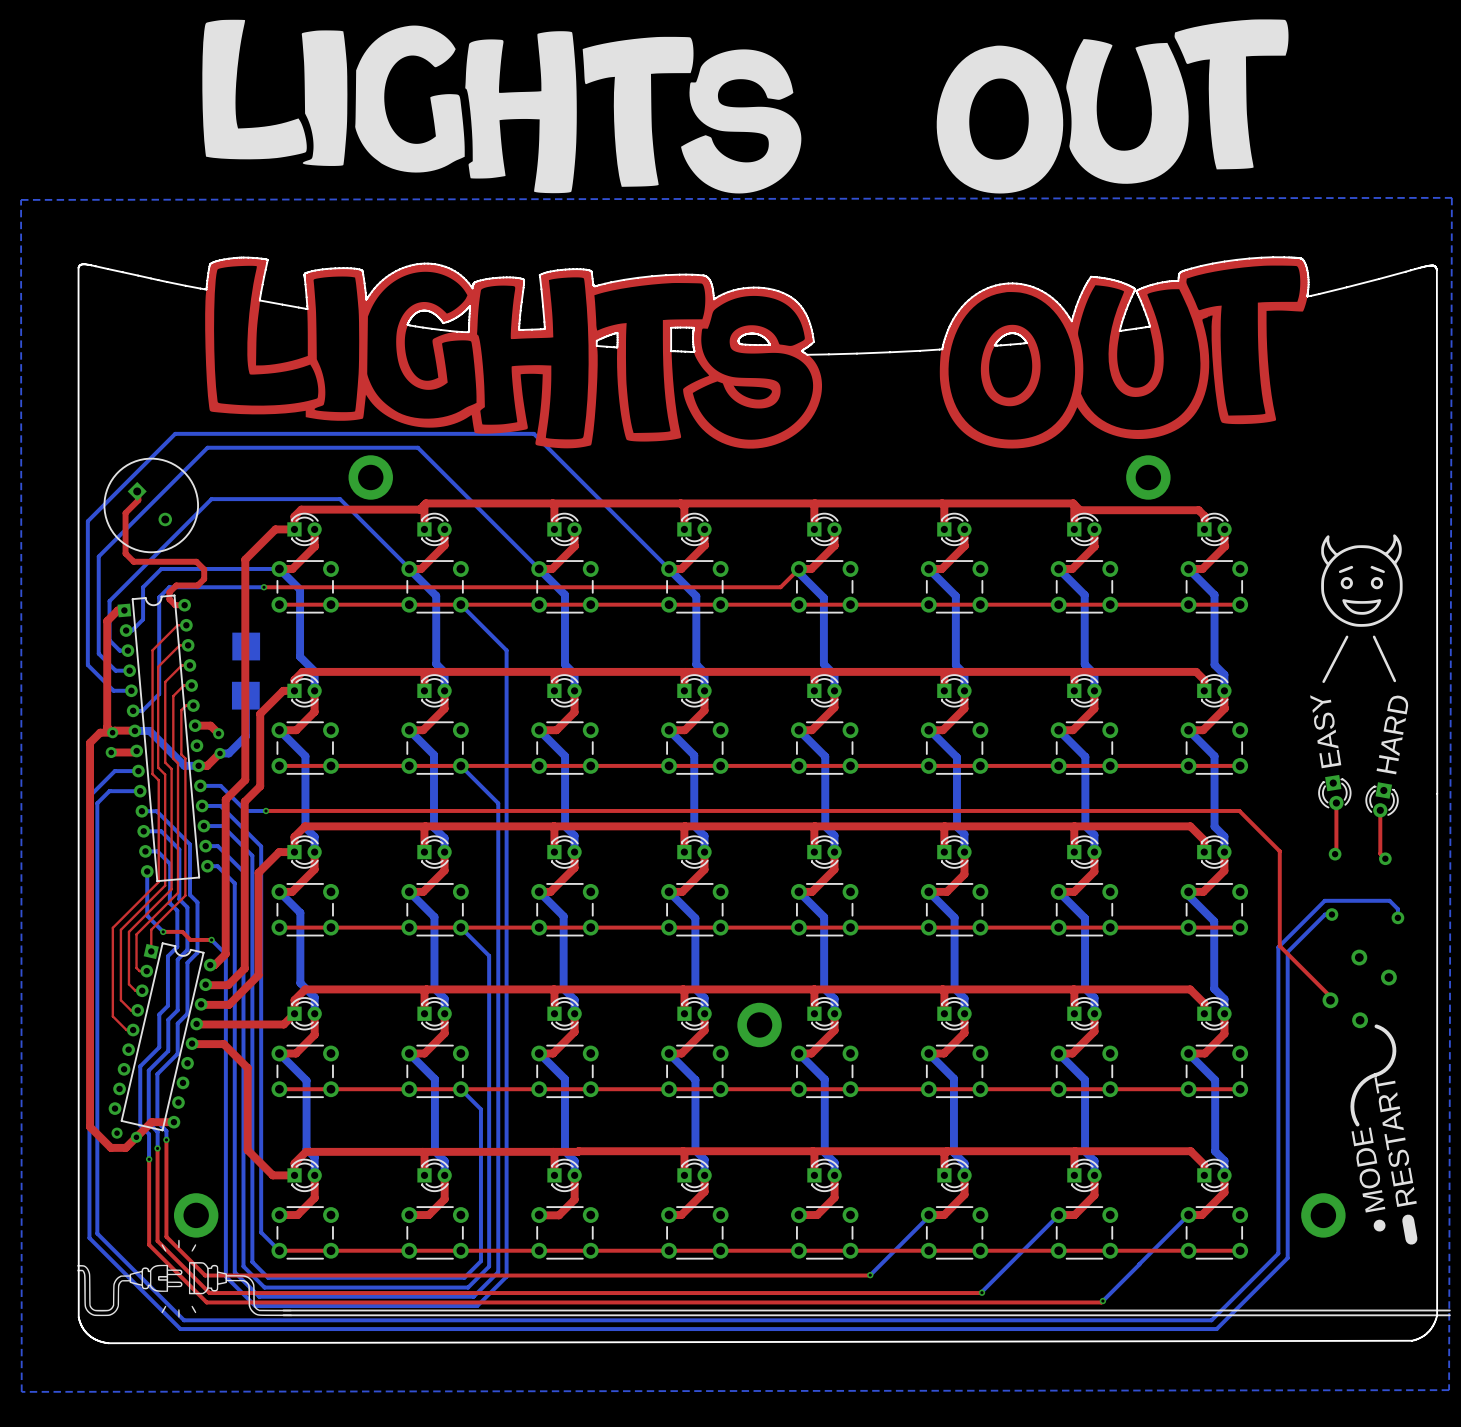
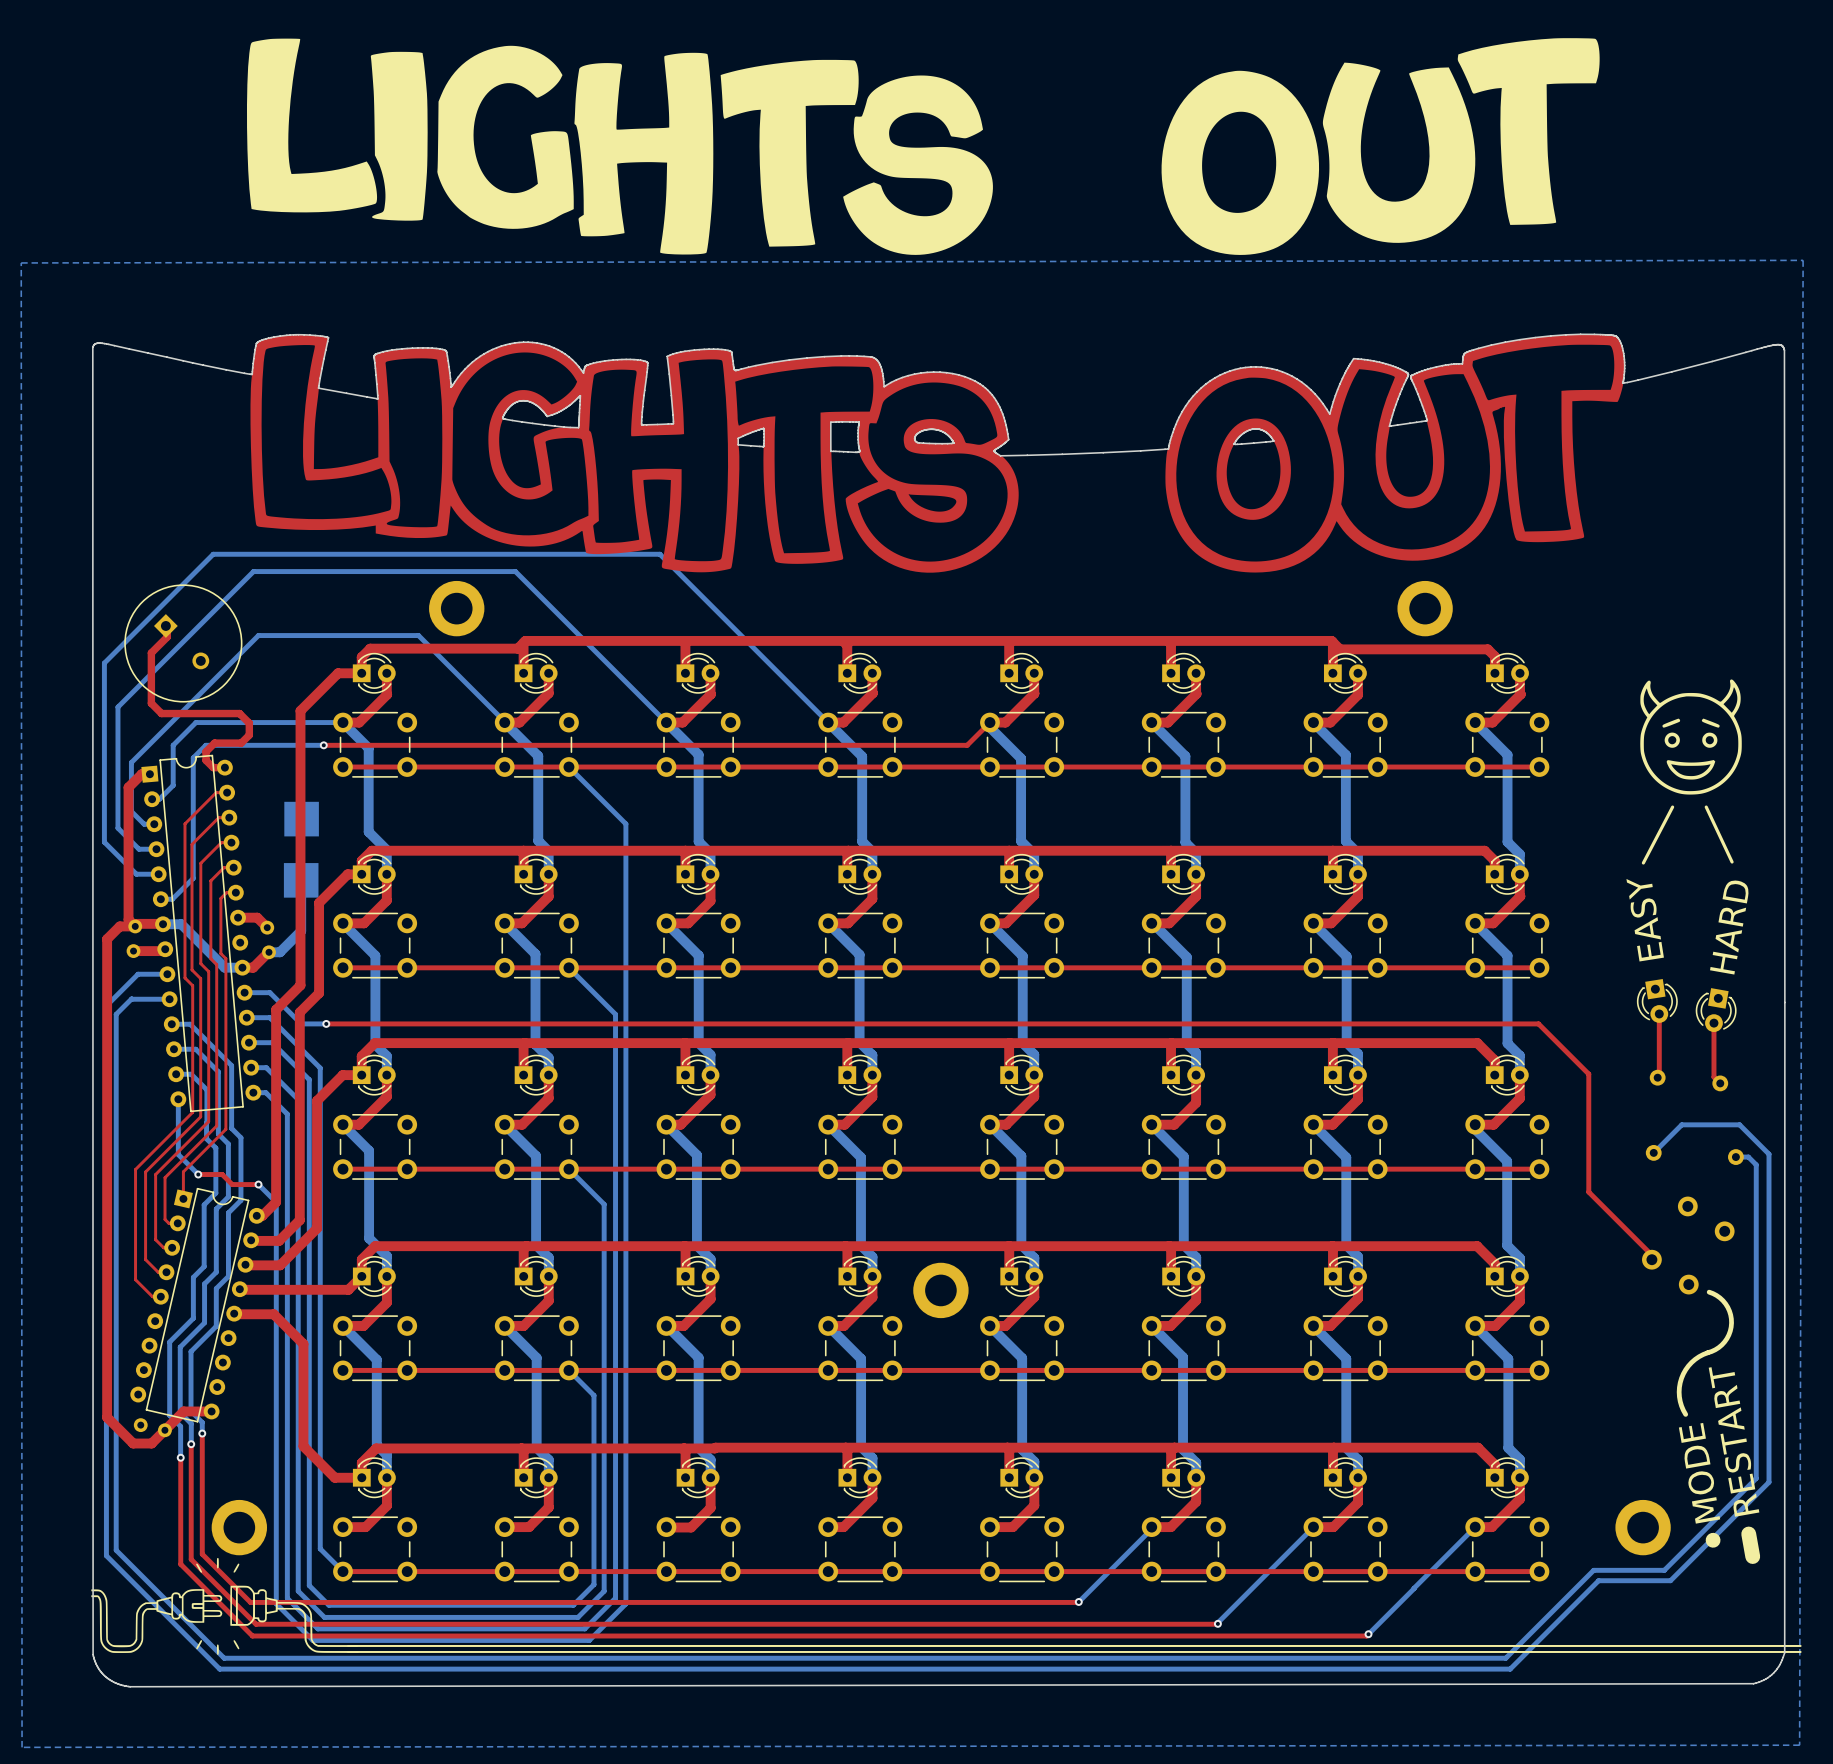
bottom track: (1331, 914) (1325, 914) (1287, 951) (1287, 1258) -> (1653, 1152) (1681, 1124) (1739, 1124) (1769, 1154) (1769, 1482) (1670, 1580) (1598, 1580)
bottom track: (1397, 917) (1397, 909) (1389, 900) (1324, 900) (1278, 947) (1278, 1253) (1211, 1320) -> (1735, 1157) (1748, 1157) (1756, 1164) (1756, 1478) (1664, 1570) (1593, 1570) (1503, 1658)

